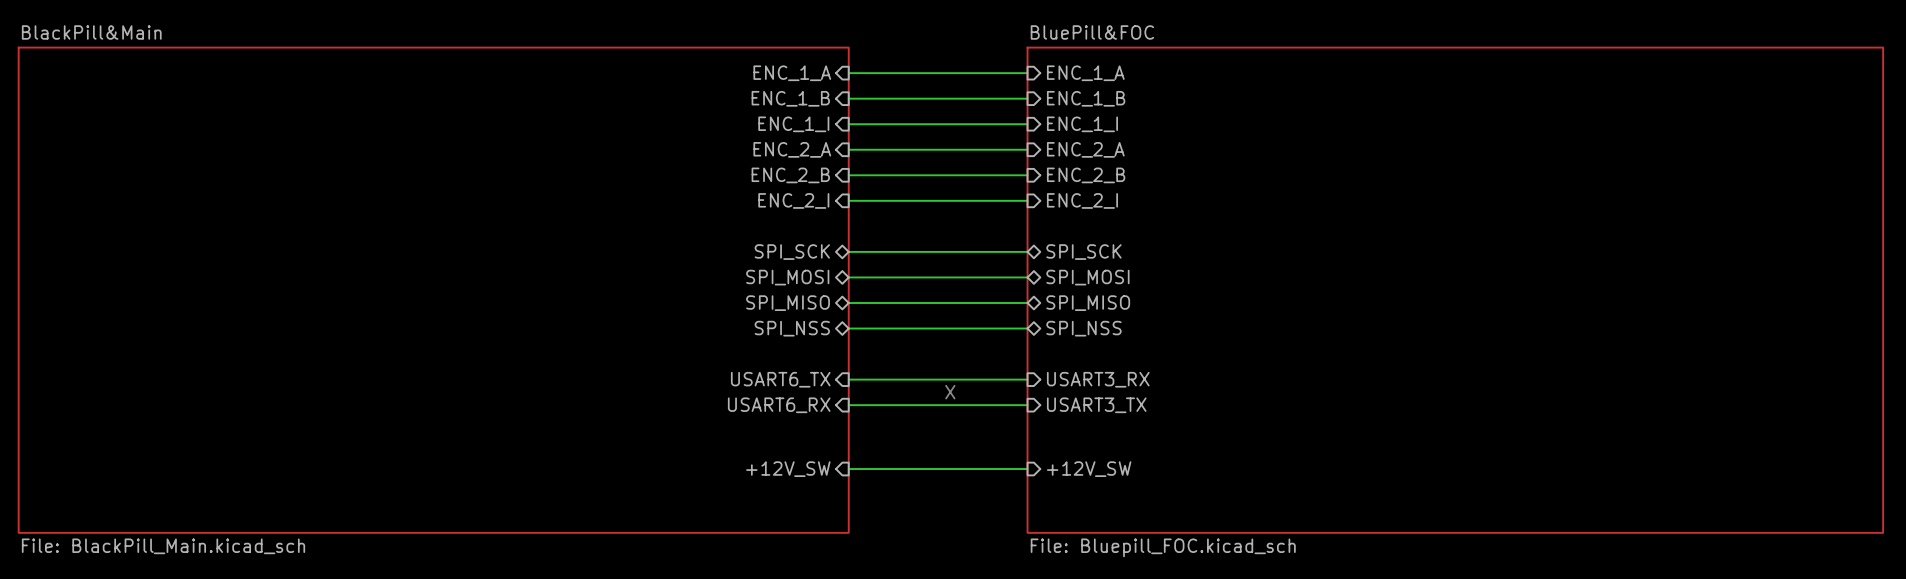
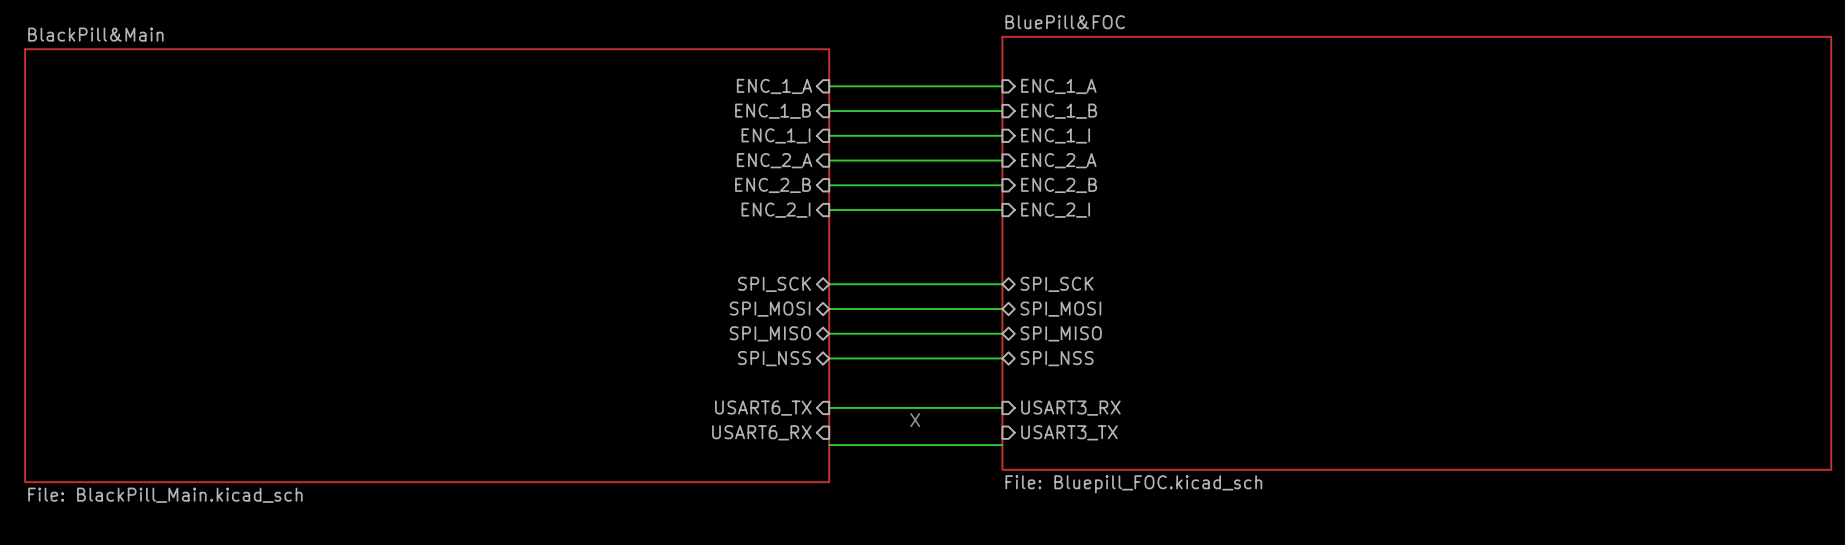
sheet BlackPill&Main shape: [17, 46, 850, 534] -> [24, 48, 830, 483]
sheet pin: ENC_1_A (792, 73) -> none
wire: (848, 73) (1027, 73) -> none
sheet pin: ENC_1_A (1085, 73) -> none
sheet pin: ENC_1_B (790, 98) -> ENC_1_A (774, 86)
sheet pin: ENC_1_B (1086, 98) -> ENC_1_A (1058, 86)
sheet pin: ENC_1_I (793, 124) -> ENC_1_B (773, 111)
sheet pin: ENC_1_I (1082, 124) -> ENC_1_B (1059, 111)
sheet pin: ENC_2_A (792, 149) -> ENC_1_I (776, 135)
sheet pin: ENC_2_A (1085, 149) -> ENC_1_I (1055, 135)
sheet pin: ENC_2_B (790, 175) -> ENC_2_A (774, 160)
sheet pin: ENC_2_B (1086, 175) -> ENC_2_A (1058, 160)
sheet pin: ENC_2_I (793, 200) -> ENC_2_B (773, 185)
sheet pin: ENC_2_I (1082, 200) -> ENC_2_B (1059, 185)
sheet pin: none -> ENC_2_I (776, 210)
sheet pin: none -> ENC_2_I (1055, 210)
wire: (848, 251) (1027, 251) -> (829, 407) (1002, 407)
sheet pin: SPI_SCK (792, 252) -> none
sheet pin: SPI_SCK (1083, 252) -> none
sheet BluePill&FOC: none -> File: Bluepill_FOC.kicad_sch (1416, 253)
sheet pin: SPI_MOSI (787, 277) -> none
wire: (848, 277) (1027, 277) -> (829, 210) (1002, 210)
sheet pin: SPI_MOSI (1087, 277) -> none
sheet BluePill&FOC: File: Bluepill_FOC.kicad_sch (1455, 290) -> none
sheet pin: SPI_MISO (788, 303) -> SPI_SCK (774, 284)
sheet pin: SPI_MISO (1088, 303) -> SPI_SCK (1057, 284)
sheet pin: SPI_NSS (792, 328) -> SPI_MOSI (770, 309)
sheet pin: SPI_NSS (1083, 328) -> SPI_MOSI (1060, 309)
sheet pin: none -> SPI_MISO (770, 333)
sheet pin: none -> SPI_MISO (1061, 333)
sheet pin shape: input (780, 379) -> bidirectional (774, 358)
sheet pin: USART6_TX (780, 379) -> SPI_NSS (774, 358)
sheet pin shape: input (1098, 379) -> bidirectional (1057, 358)
sheet pin: USART3_RX (1098, 379) -> SPI_NSS (1057, 358)
text position: X (950, 392) -> X (915, 420)
sheet pin position: USART6_RX (779, 405) -> USART6_RX (761, 432)
wire: (848, 405) (1027, 405) -> (829, 333) (1002, 333)
sheet pin position: USART3_TX (1096, 405) -> USART3_TX (1069, 432)
sheet pin: none -> USART6_TX (763, 408)
sheet pin: none -> USART3_RX (1070, 408)
sheet pin: +12V_SW (788, 469) -> none
sheet pin: +12V_SW (1089, 469) -> none

